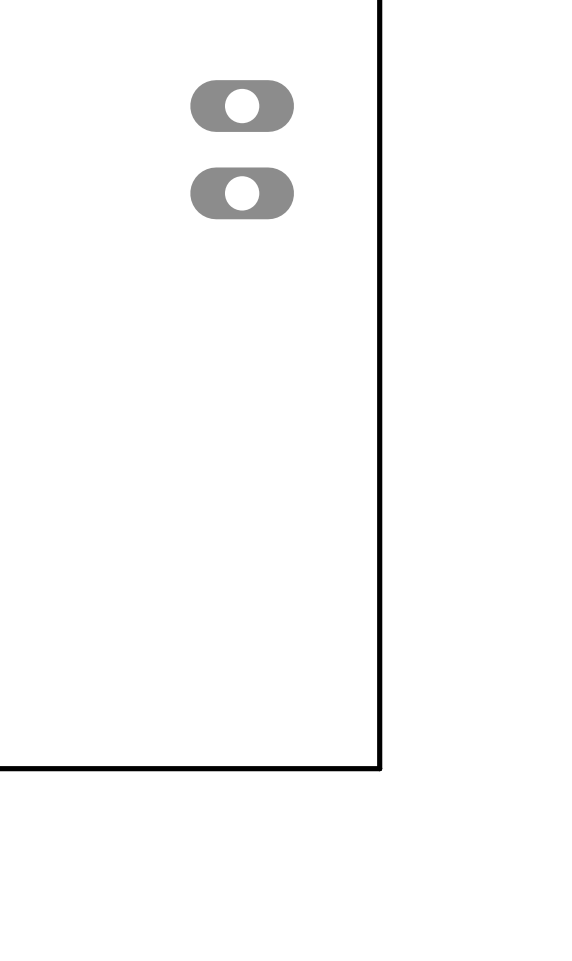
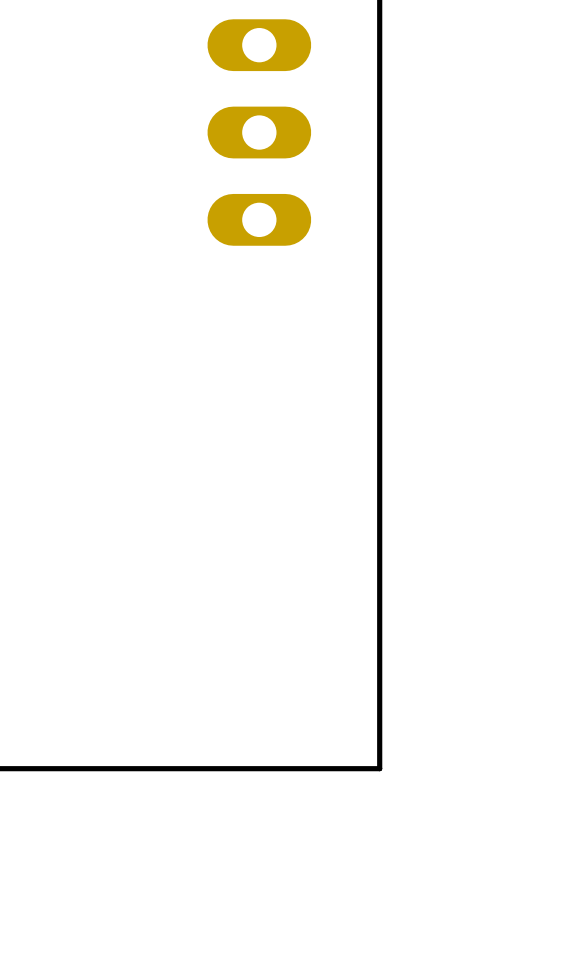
part footprint: [190, 80, 294, 220] -> [207, 19, 312, 246]

